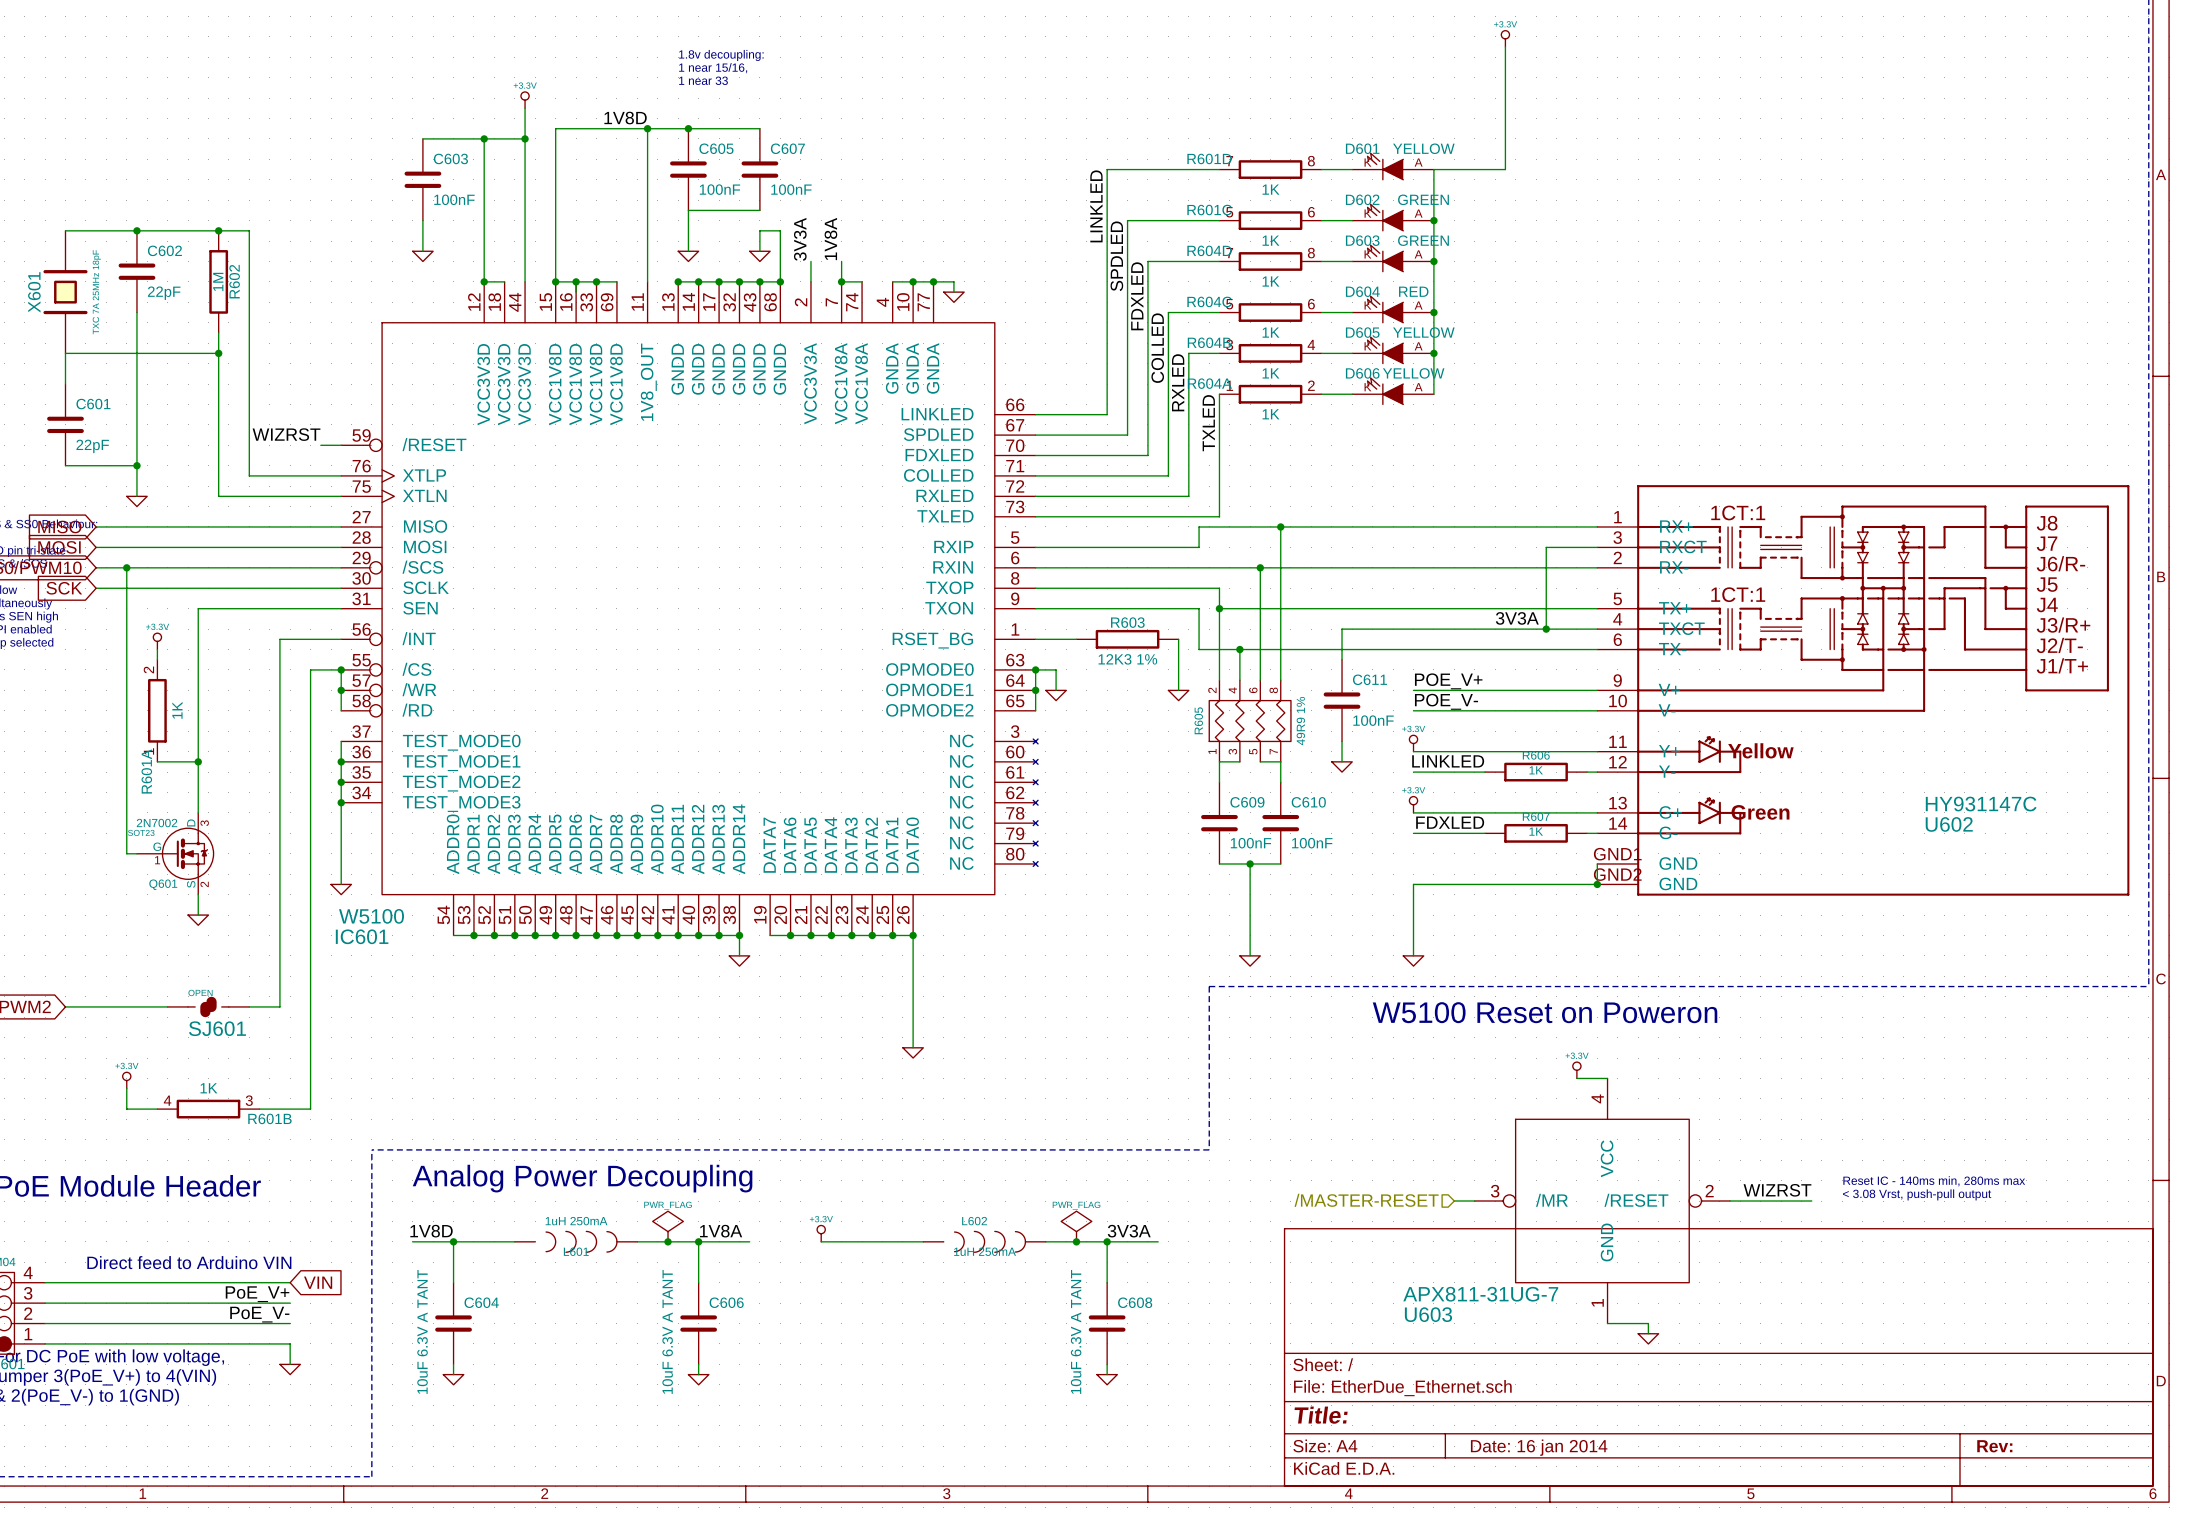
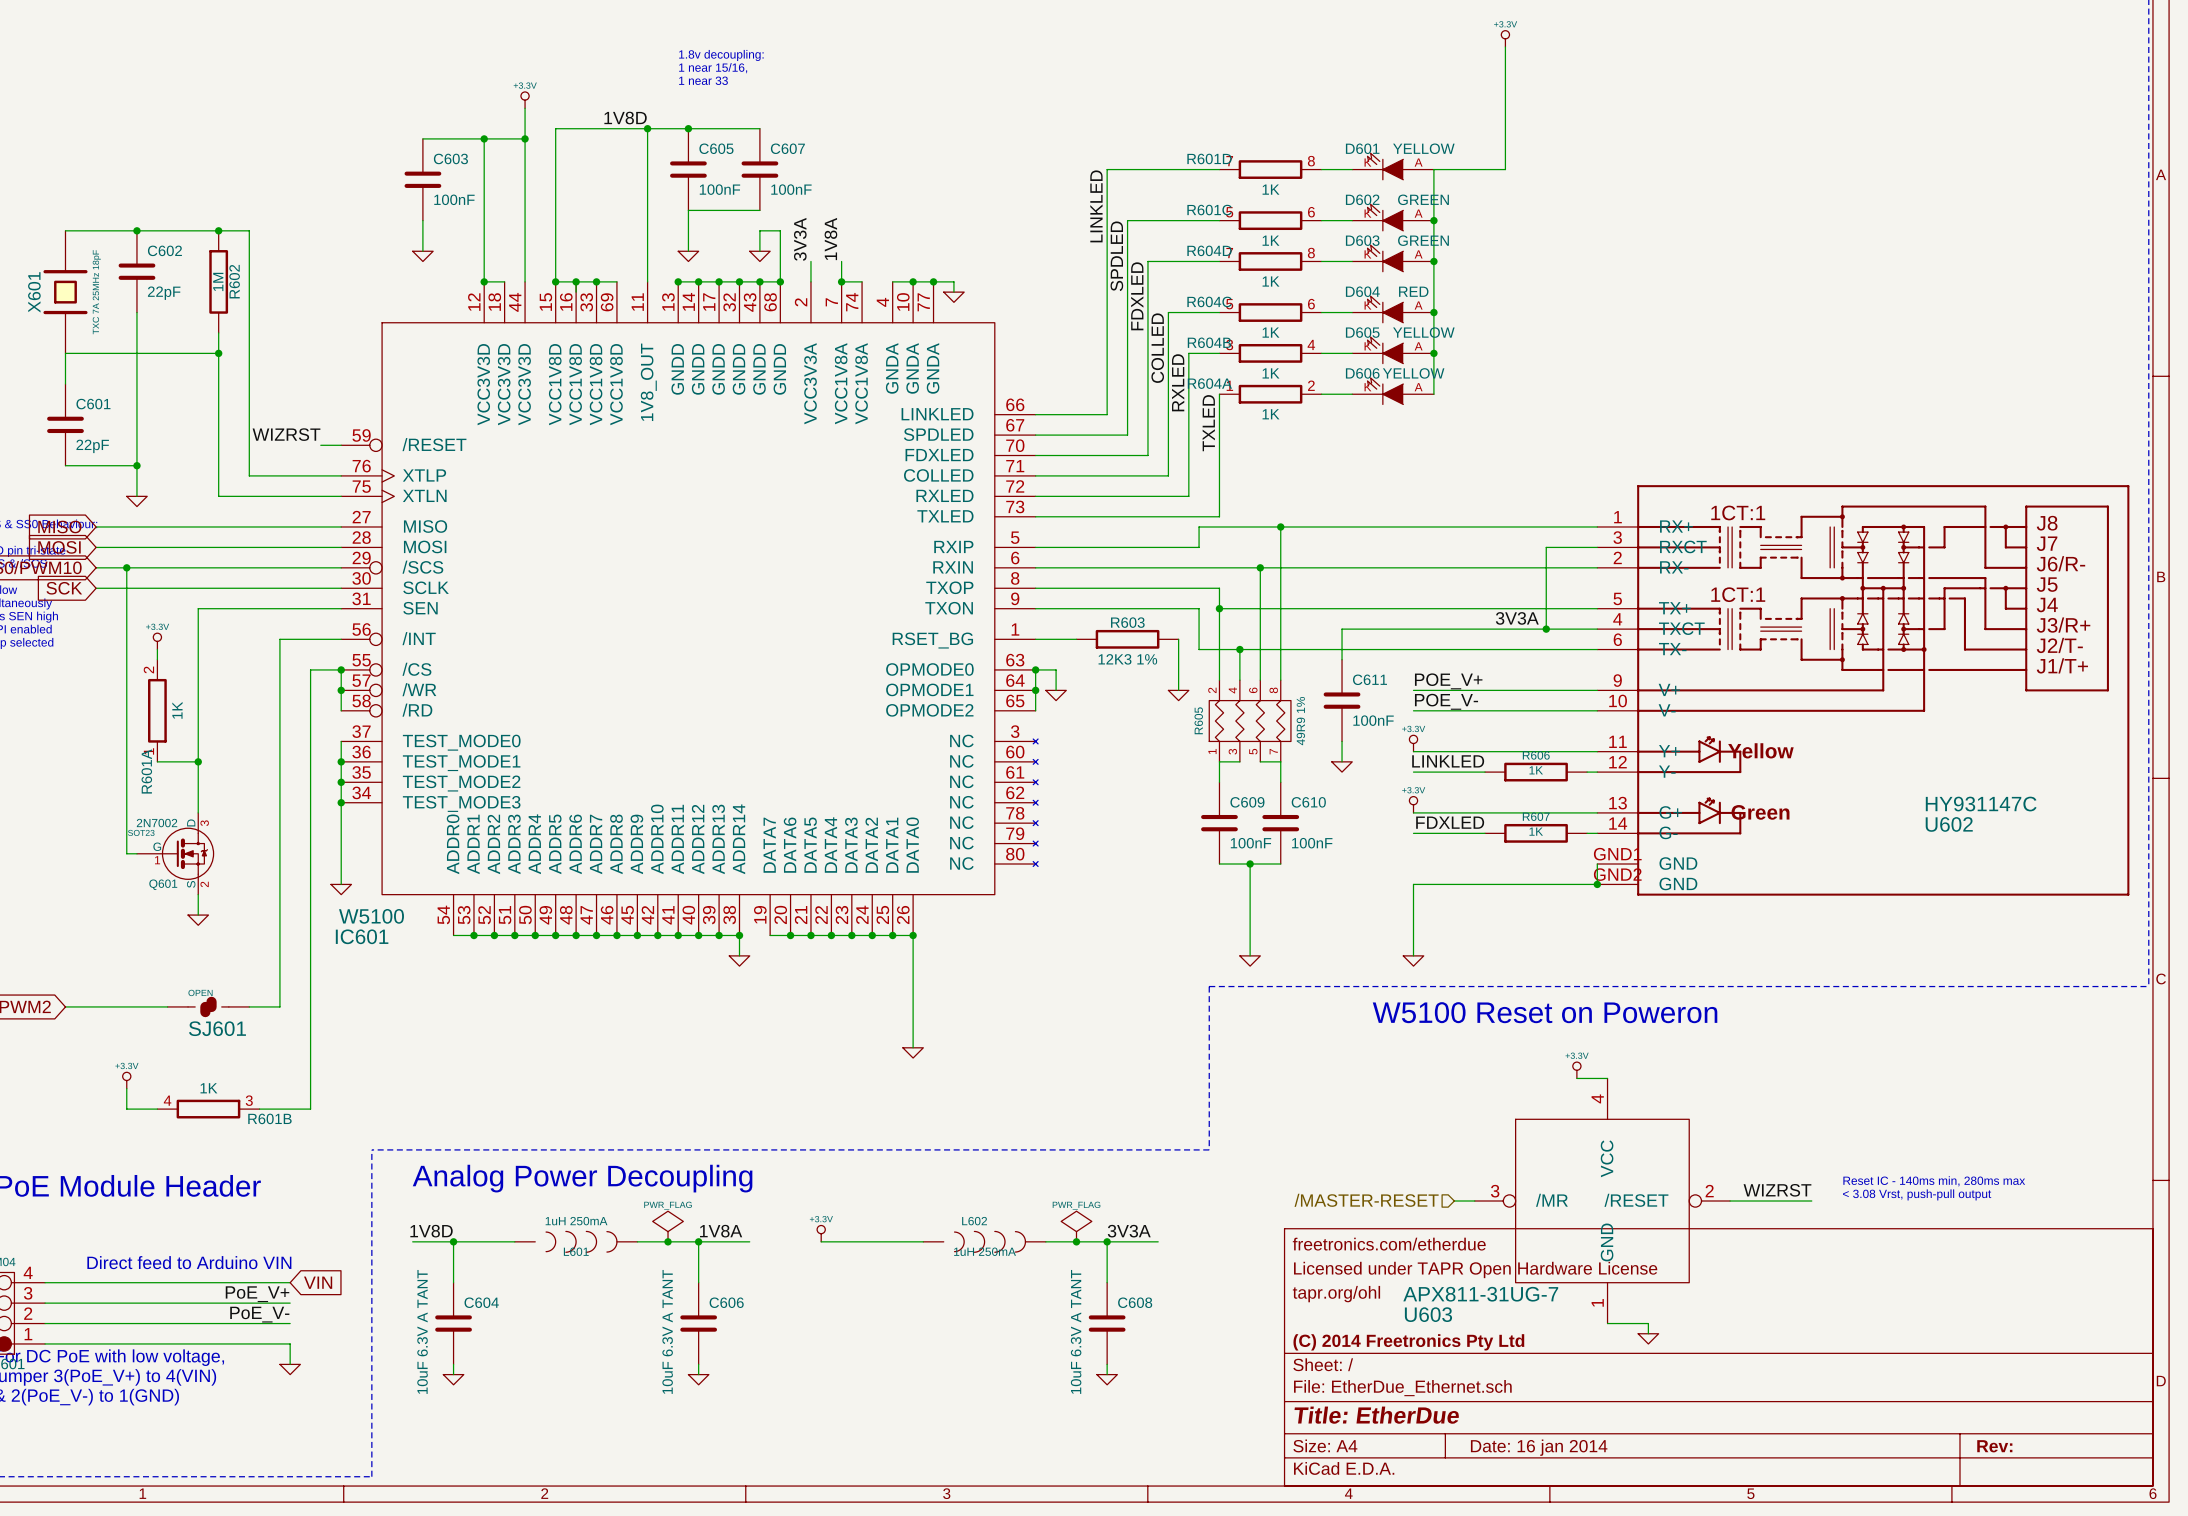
title block: none -> freetronics.com/etherdue (1389, 1244)
title block: none -> Licensed under TAPR Open Hardware License (1475, 1269)
title block: none -> tapr.org/ohl (1336, 1294)
title block: none -> (C) 2014 Freetronics Pty Ltd (1408, 1342)
title block: Title: (1321, 1415) -> Title: EtherDue (1376, 1415)

